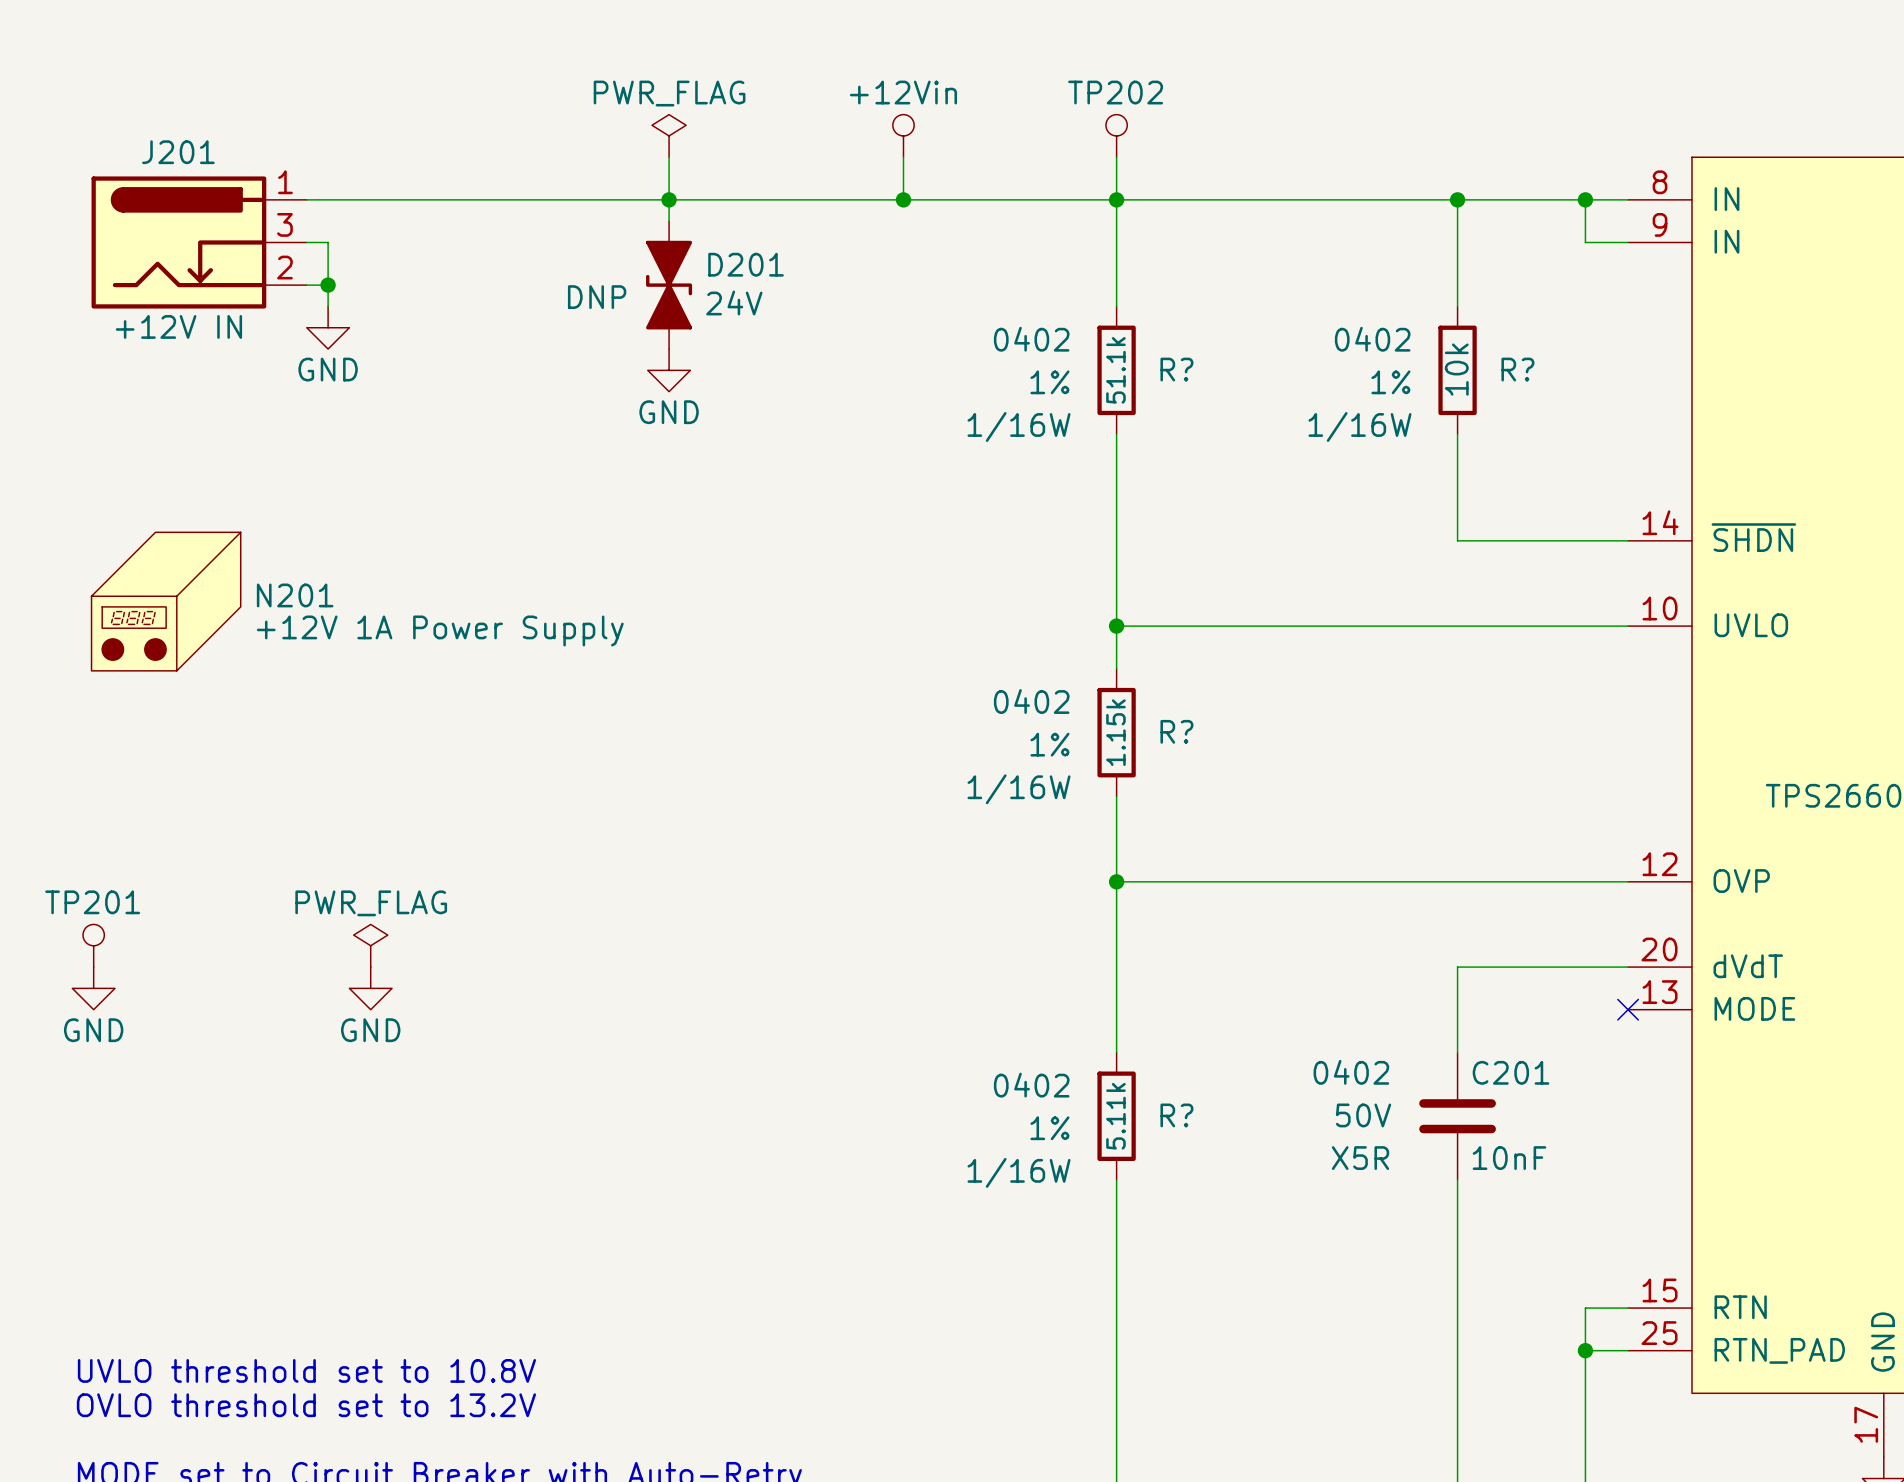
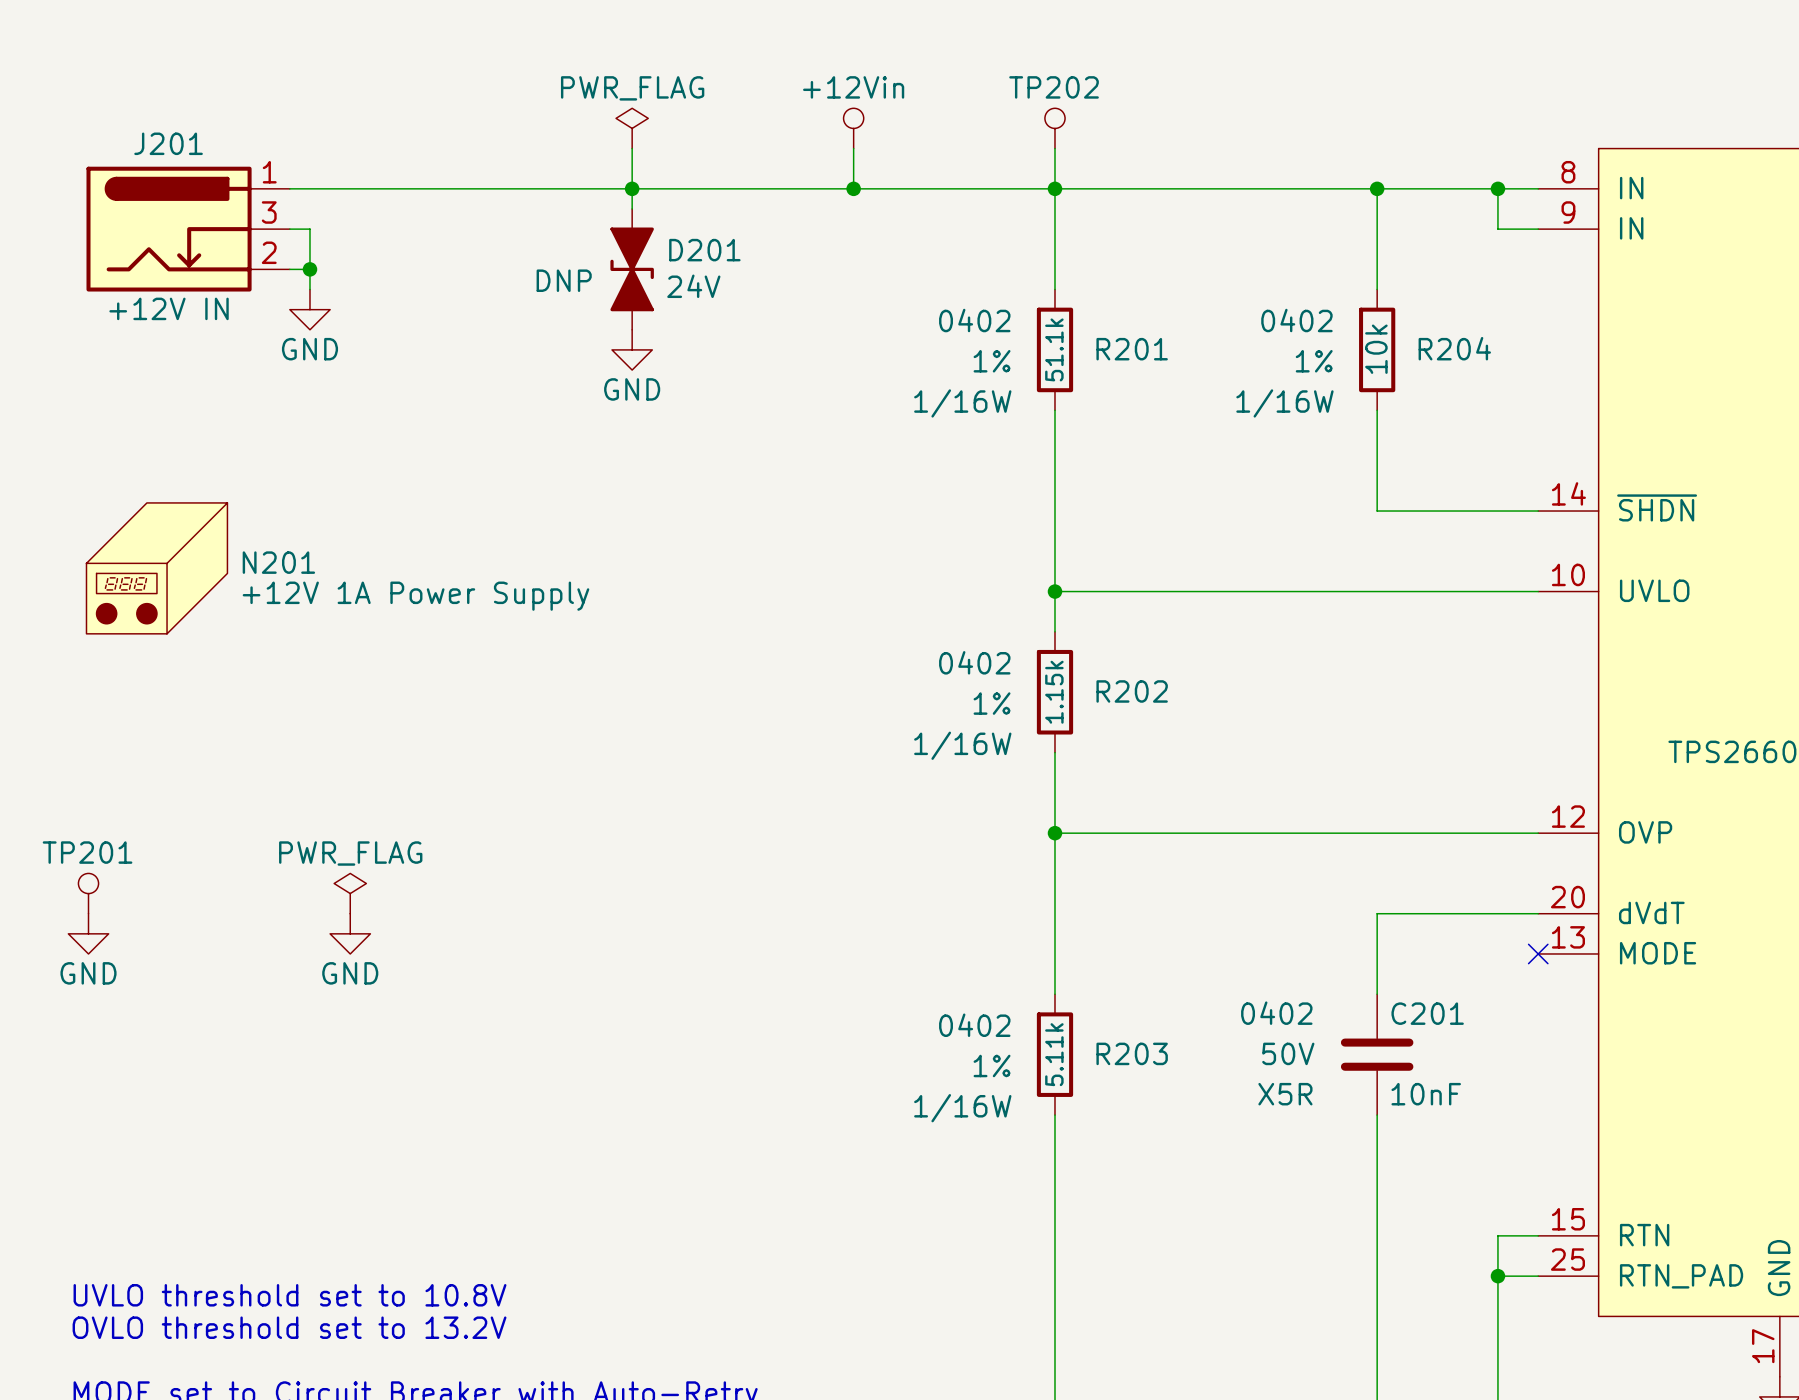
R? name: R? (1176, 369) -> R201 (1132, 349)
R? name: R? (1517, 369) -> R204 (1454, 348)
R? name: R? (1176, 731) -> R202 (1132, 691)
R? name: R? (1176, 1115) -> R203 (1132, 1053)

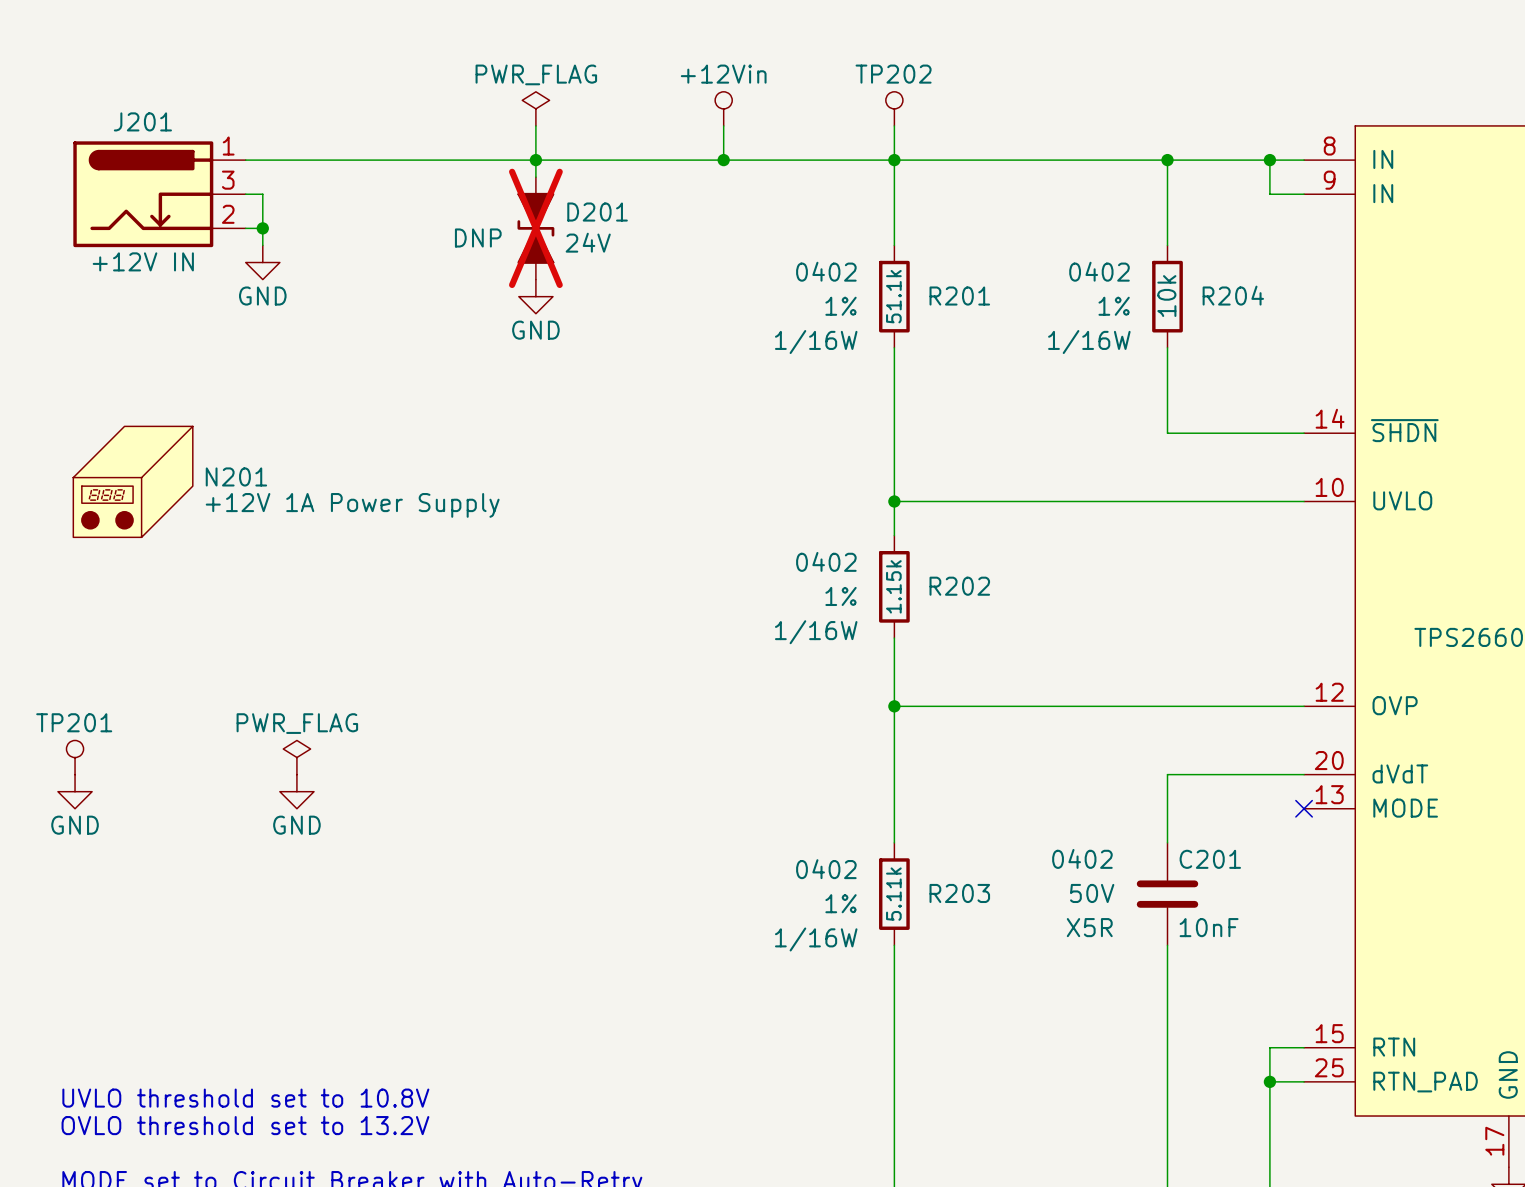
D201 do-not-place cross: none -> (535, 228)

